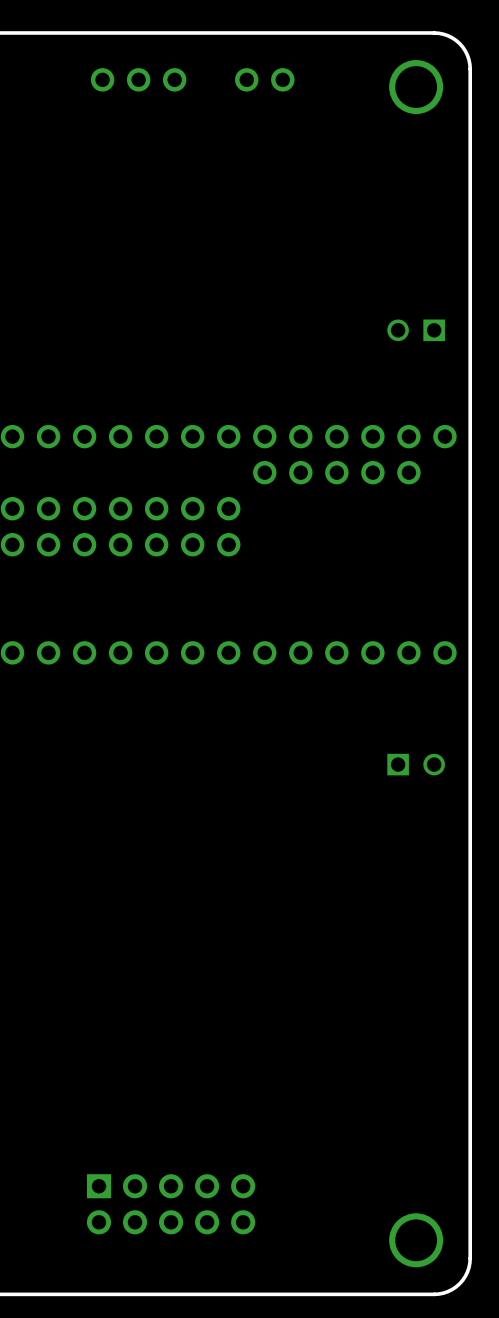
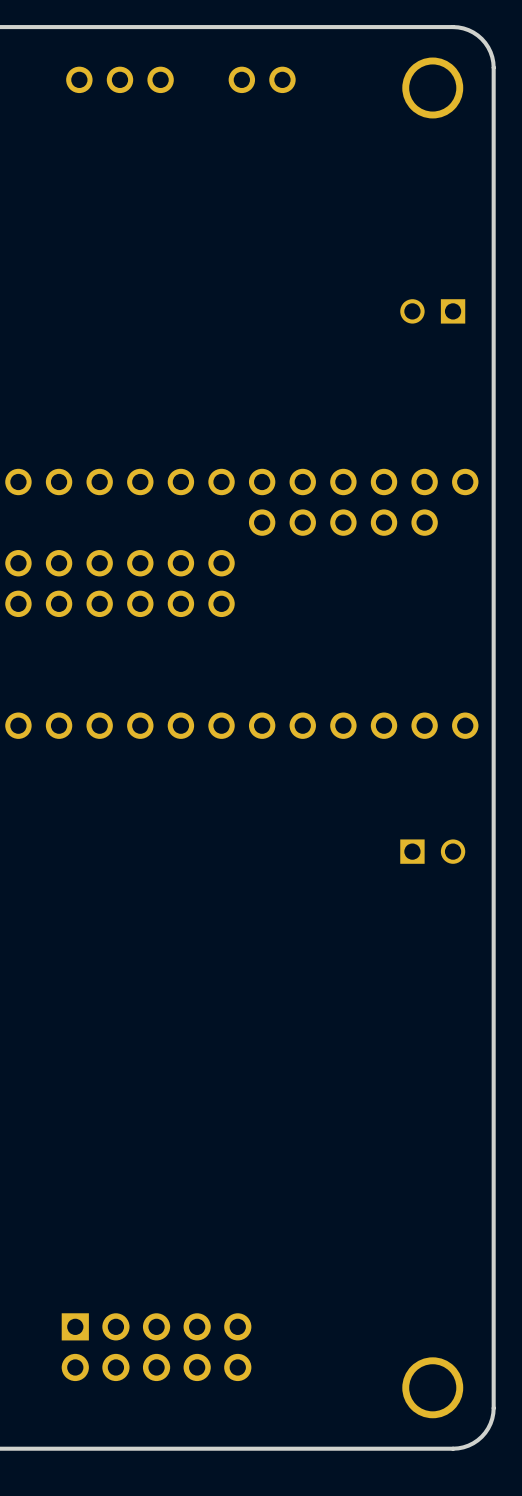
part position: (416, 330) -> (432, 311)

